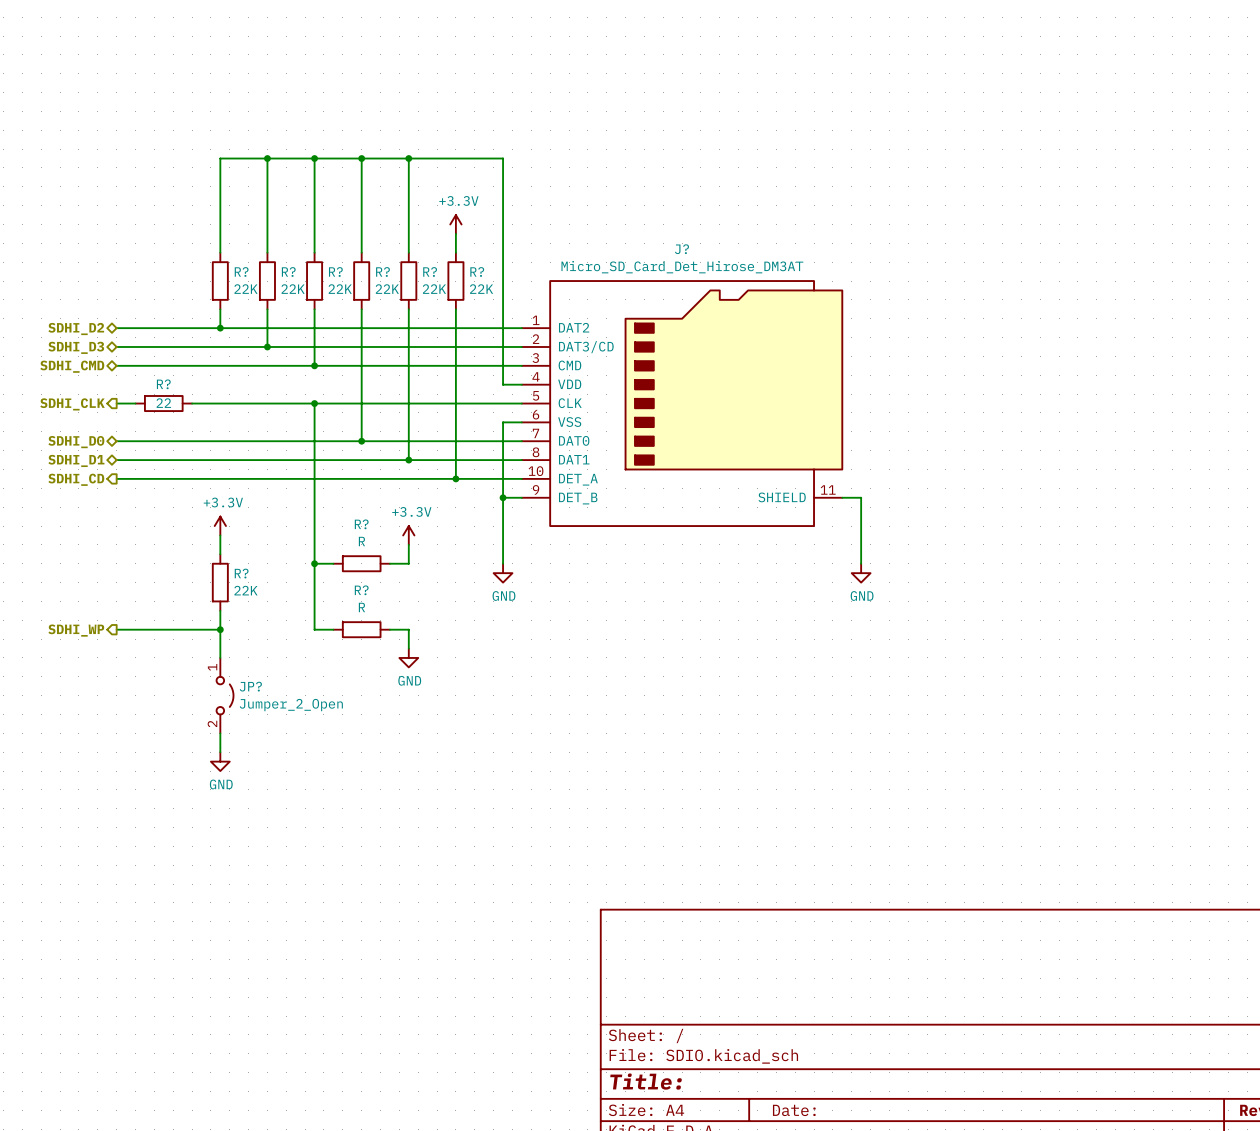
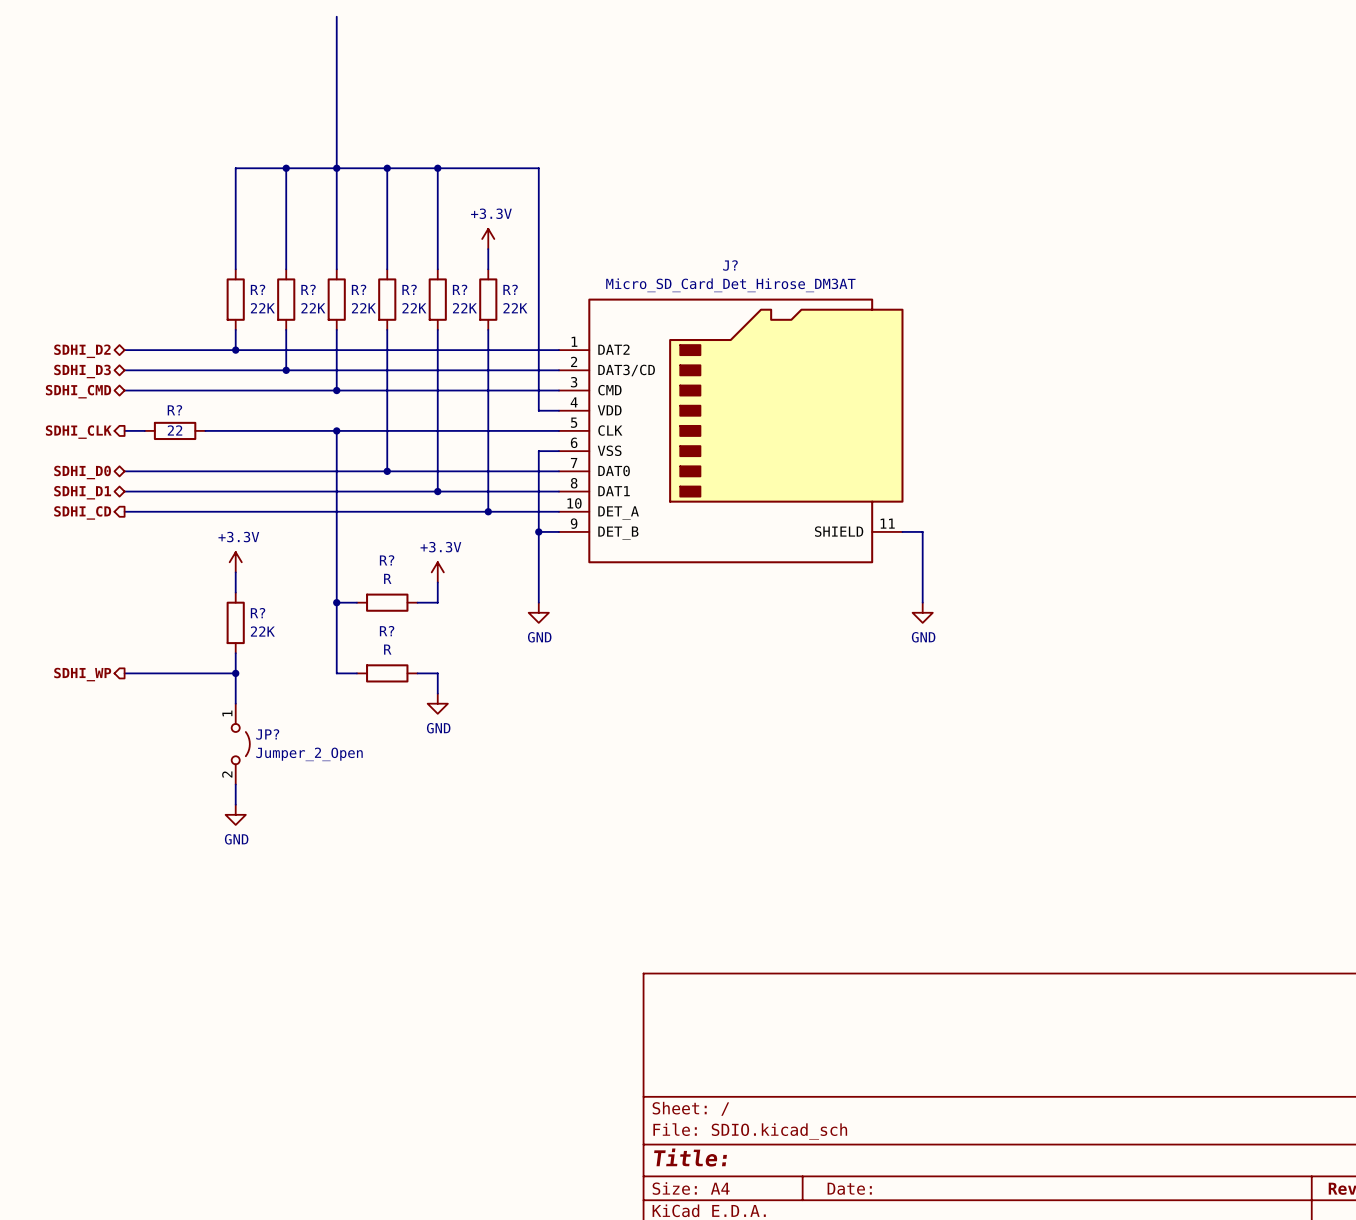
wire: none -> (336, 16) (336, 168)

